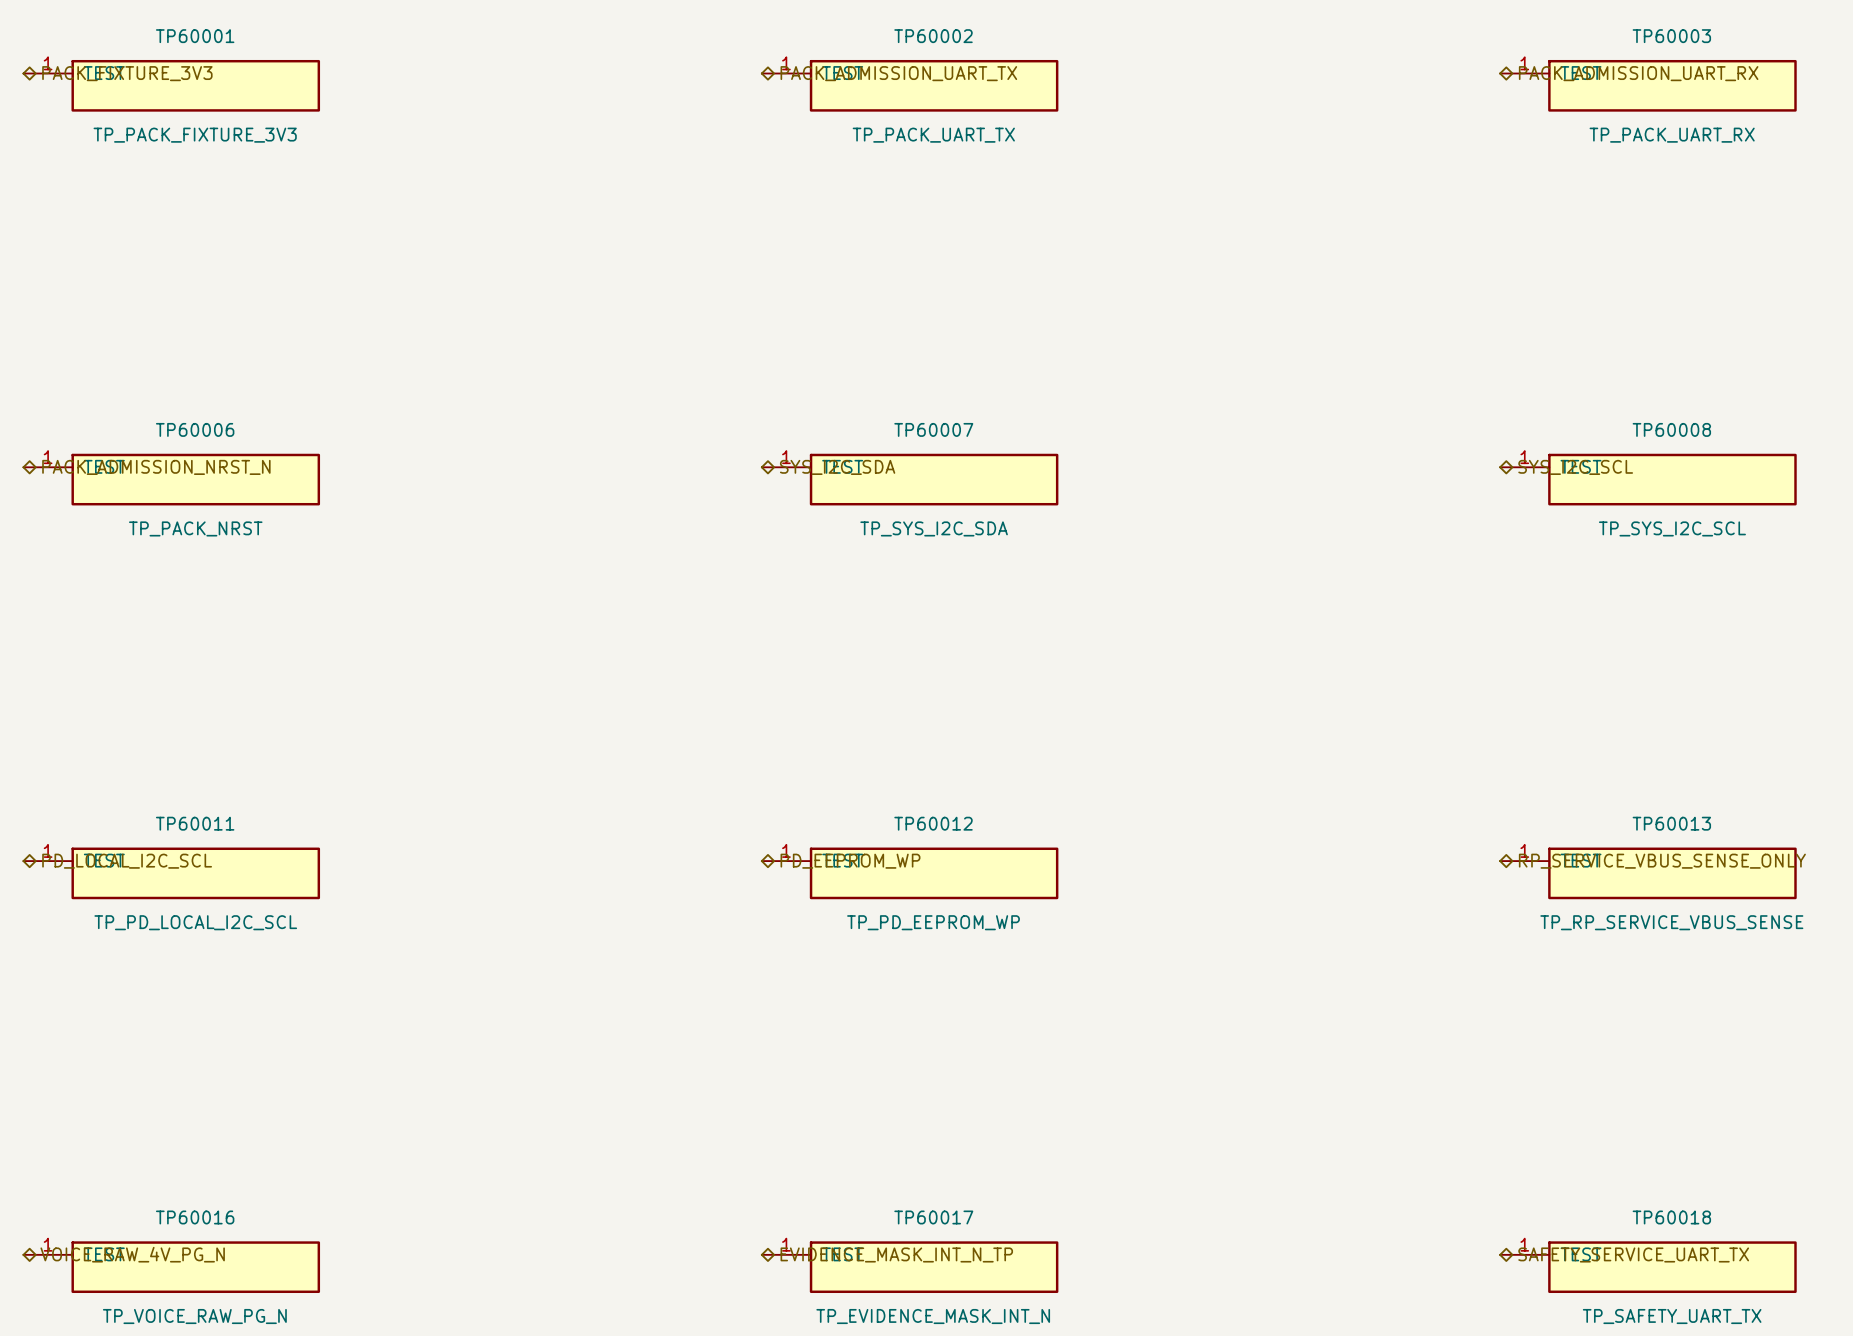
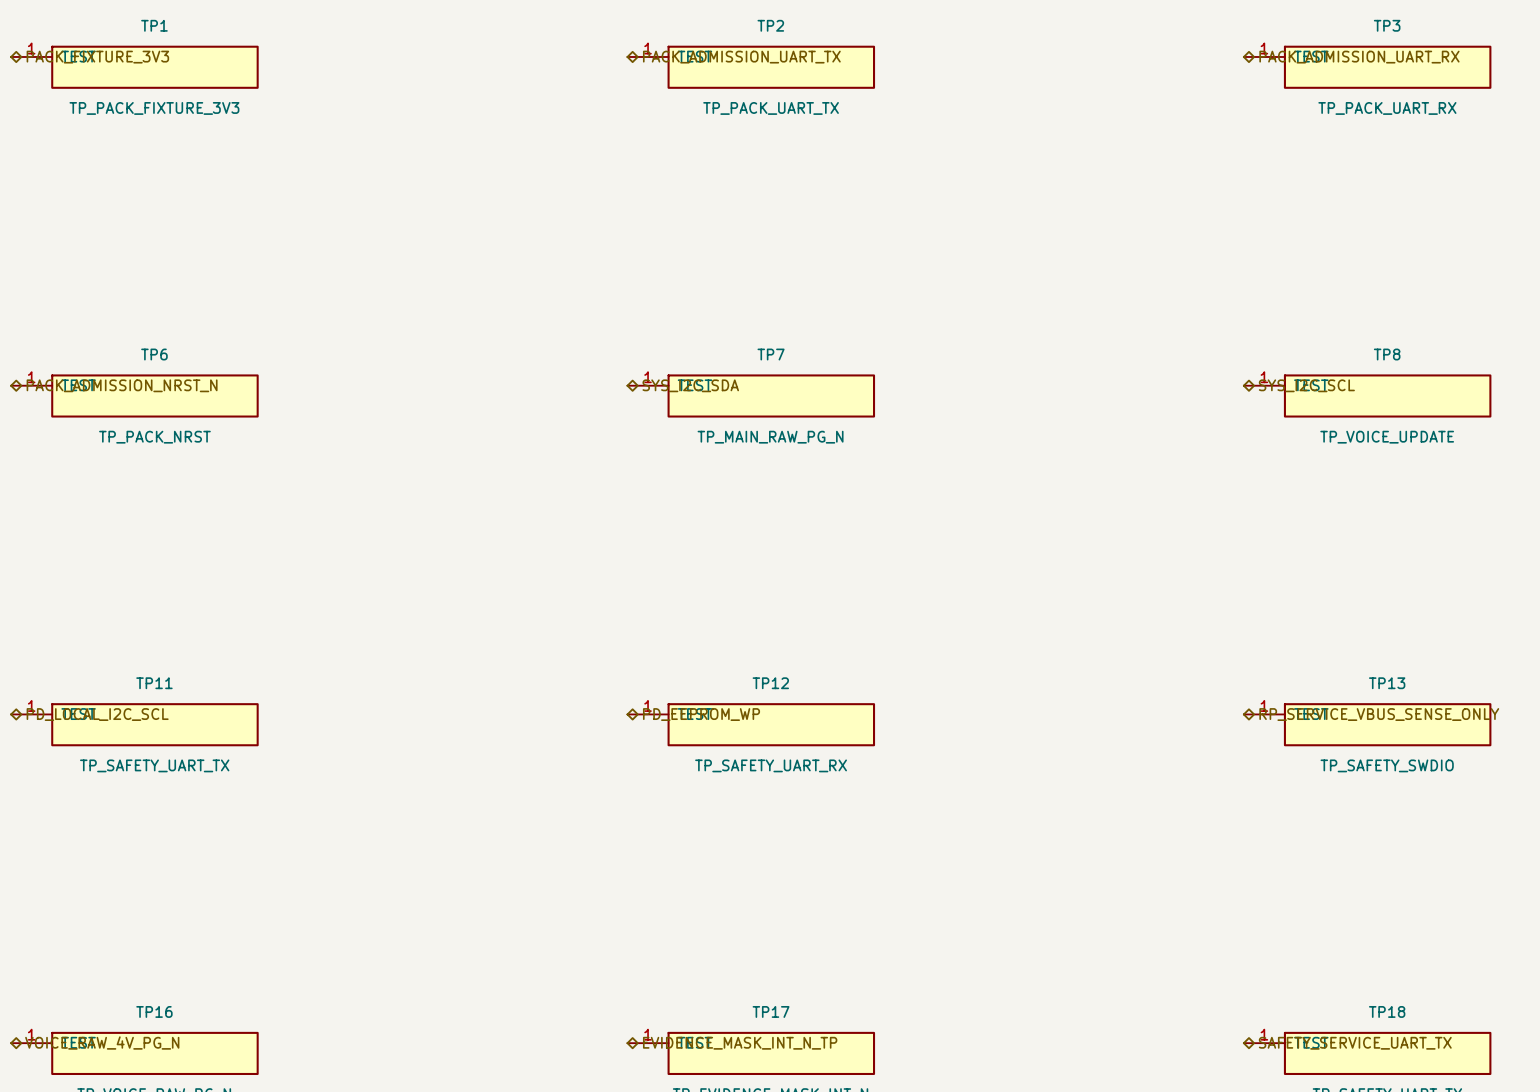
TP60001 name: TP60001 (195, 36) -> TP1 (154, 25)
TP60002 name: TP60002 (933, 36) -> TP2 (770, 25)
TP60003 name: TP60003 (1671, 36) -> TP3 (1387, 25)
TP60006 name: TP60006 (195, 429) -> TP6 (154, 354)
TP60007 name: TP60007 (933, 429) -> TP7 (771, 354)
TP60008 name: TP60008 (1671, 429) -> TP8 (1387, 354)
TP60007 value: TP_SYS_I2C_SDA (934, 528) -> TP_MAIN_RAW_PG_N (770, 437)
TP60008 value: TP_SYS_I2C_SCL (1672, 528) -> TP_VOICE_UPDATE (1387, 437)
TP60011 name: TP60011 (195, 823) -> TP11 (154, 683)
TP60012 name: TP60012 (933, 823) -> TP12 (770, 683)
TP60013 name: TP60013 (1671, 823) -> TP13 (1387, 683)
TP60011 value: TP_PD_LOCAL_I2C_SCL (195, 922) -> TP_SAFETY_UART_TX (154, 765)
TP60012 value: TP_PD_EEPROM_WP (933, 922) -> TP_SAFETY_UART_RX (771, 765)
TP60013 value: TP_RP_SERVICE_VBUS_SENSE (1671, 922) -> TP_SAFETY_SWDIO (1387, 765)
TP60016 name: TP60016 (195, 1217) -> TP16 (154, 1011)
TP60017 name: TP60017 (933, 1217) -> TP17 (771, 1011)
TP60018 name: TP60018 (1671, 1217) -> TP18 (1387, 1011)

